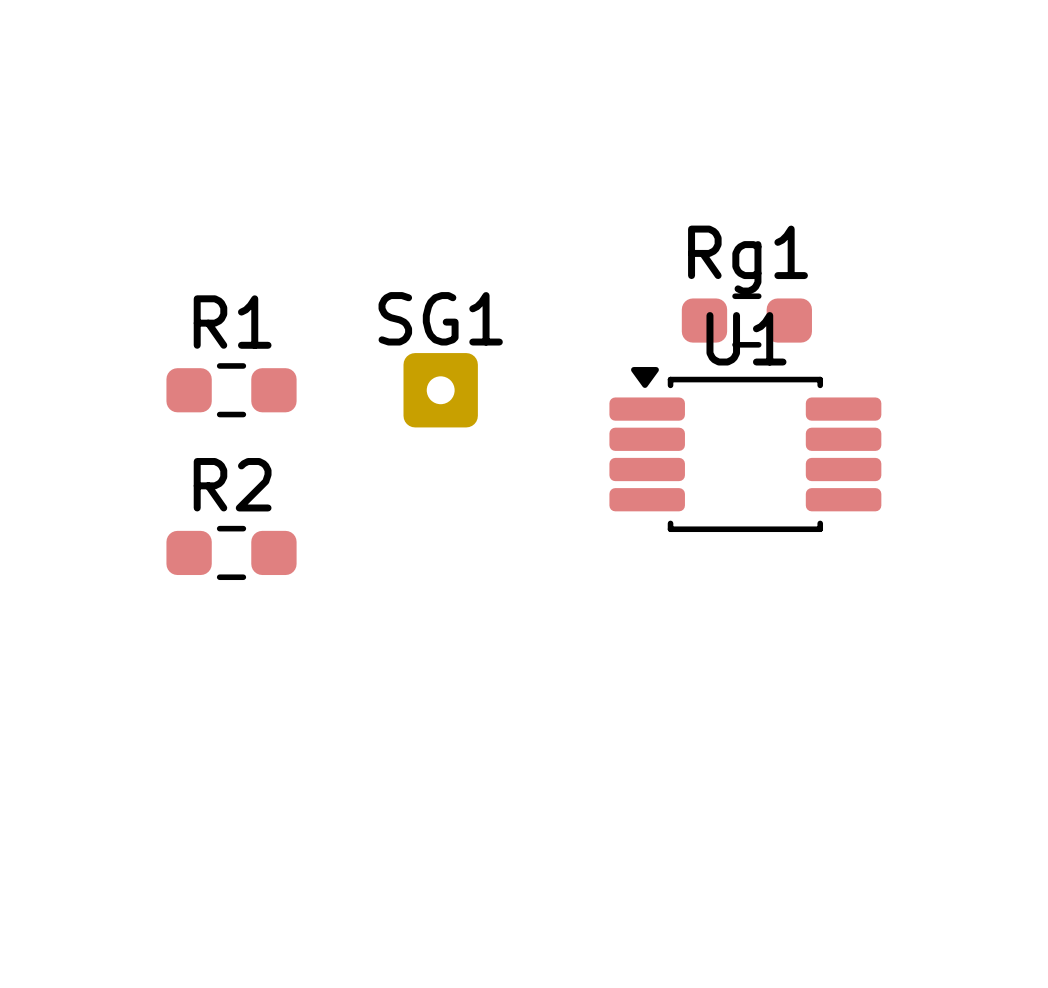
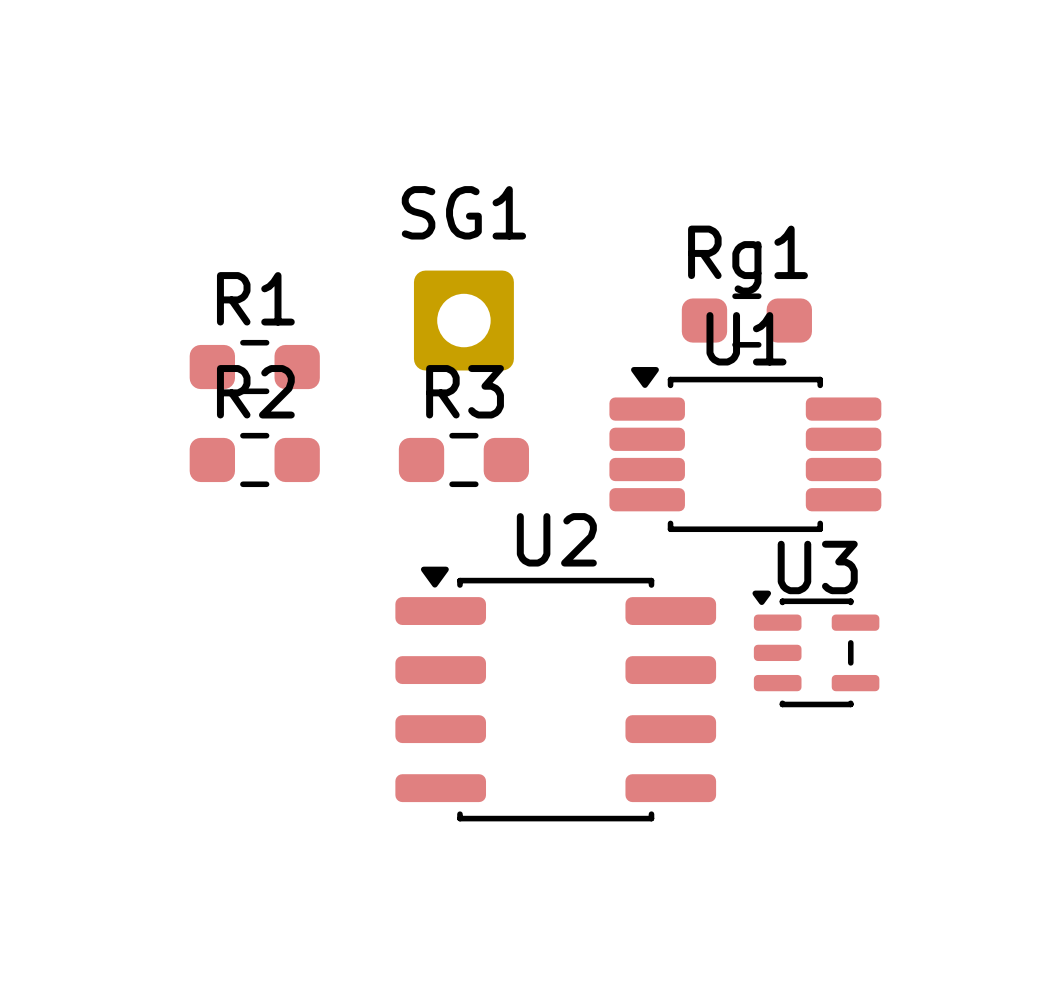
SG1 footprint: [403, 353, 478, 428] -> [413, 270, 514, 371]
R1 position: (231, 390) -> (254, 367)
R3: none -> (463, 459)
R2 position: (231, 552) -> (254, 459)
U3: none -> (815, 648)
U2: none -> (555, 694)

